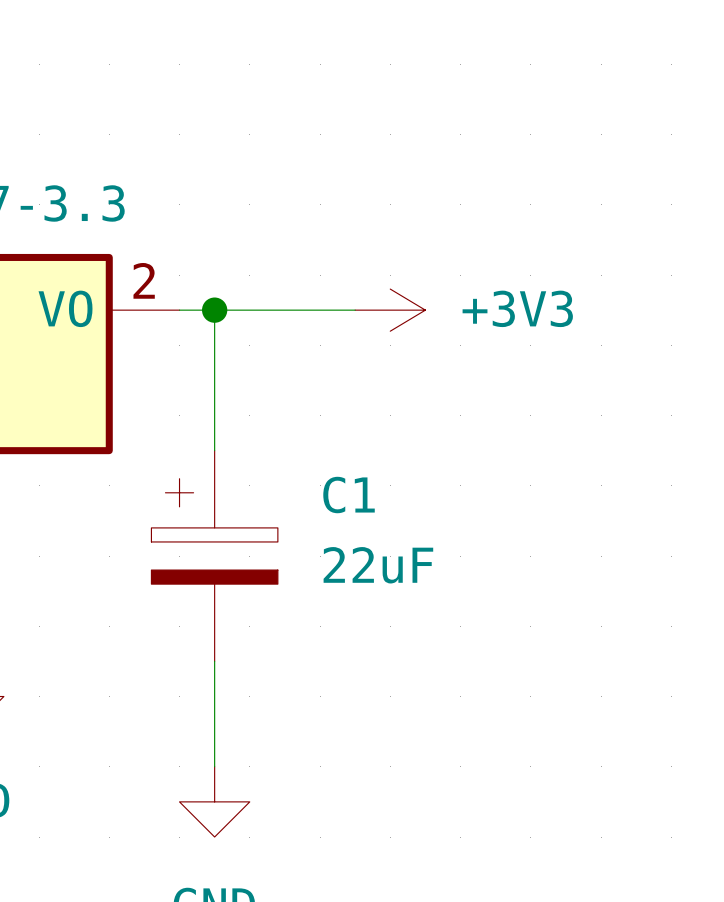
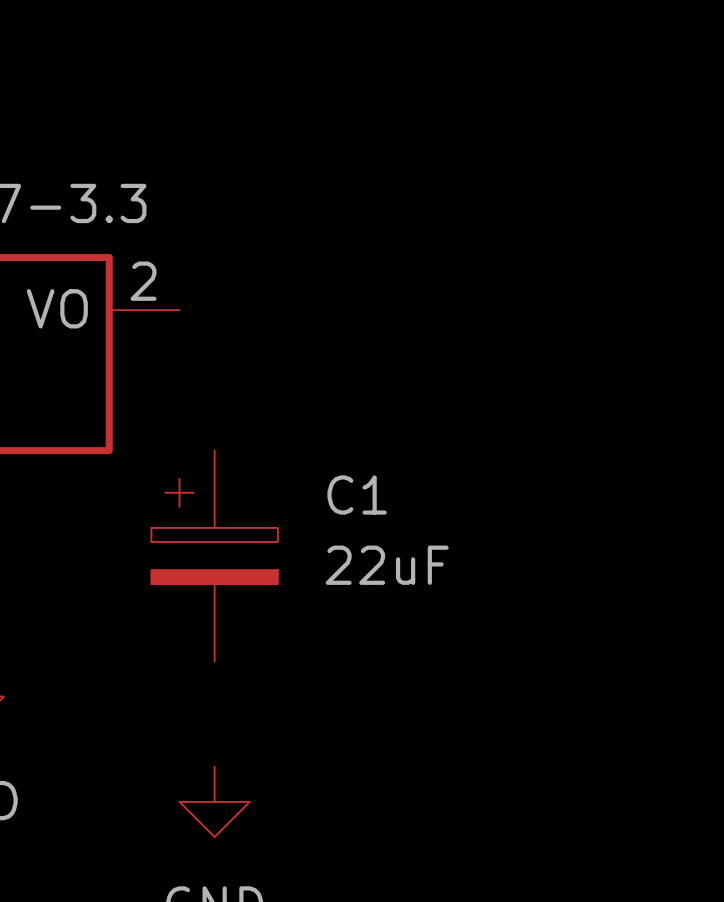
wire: (179, 310) (355, 310) -> none
wire: (214, 310) (214, 450) -> none
junction: (214, 310) -> none
power symbol: +3V3 (390, 310) -> none
wire: (214, 661) (214, 766) -> none

